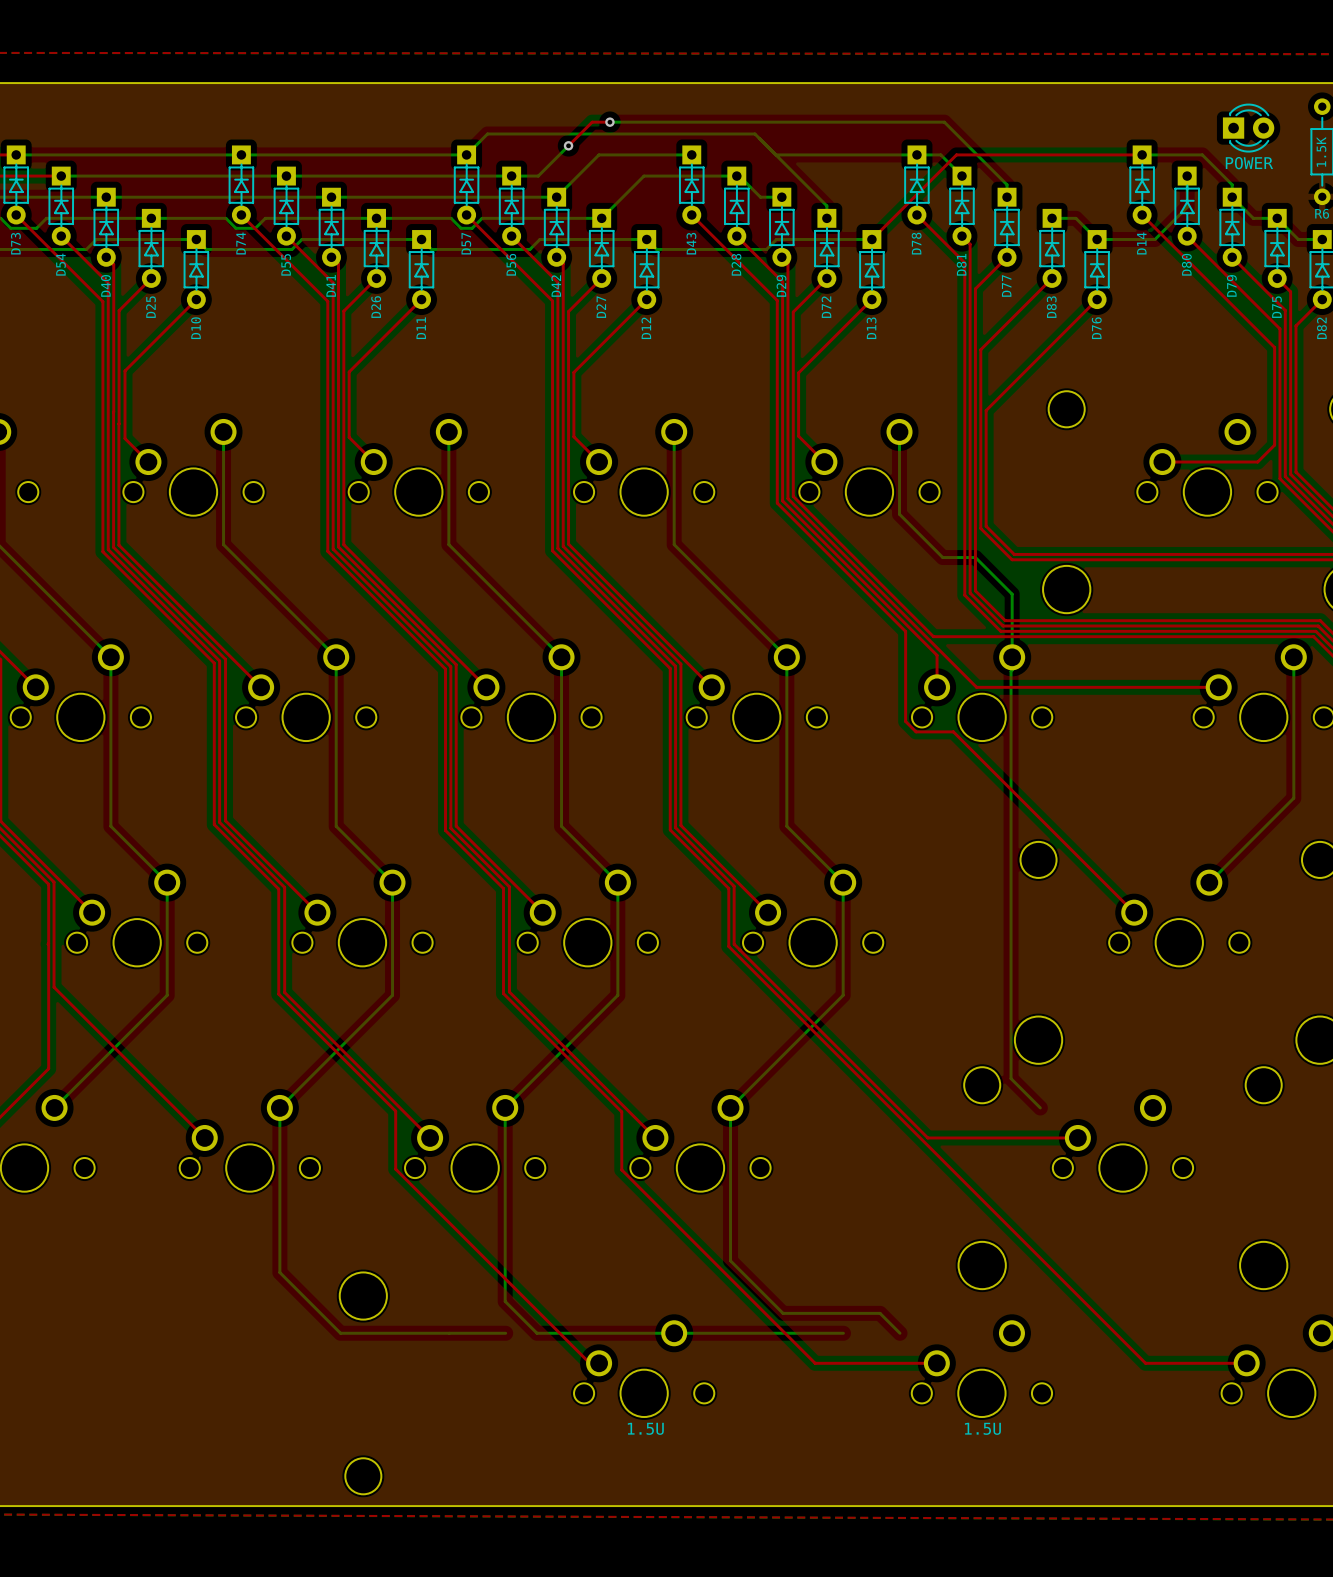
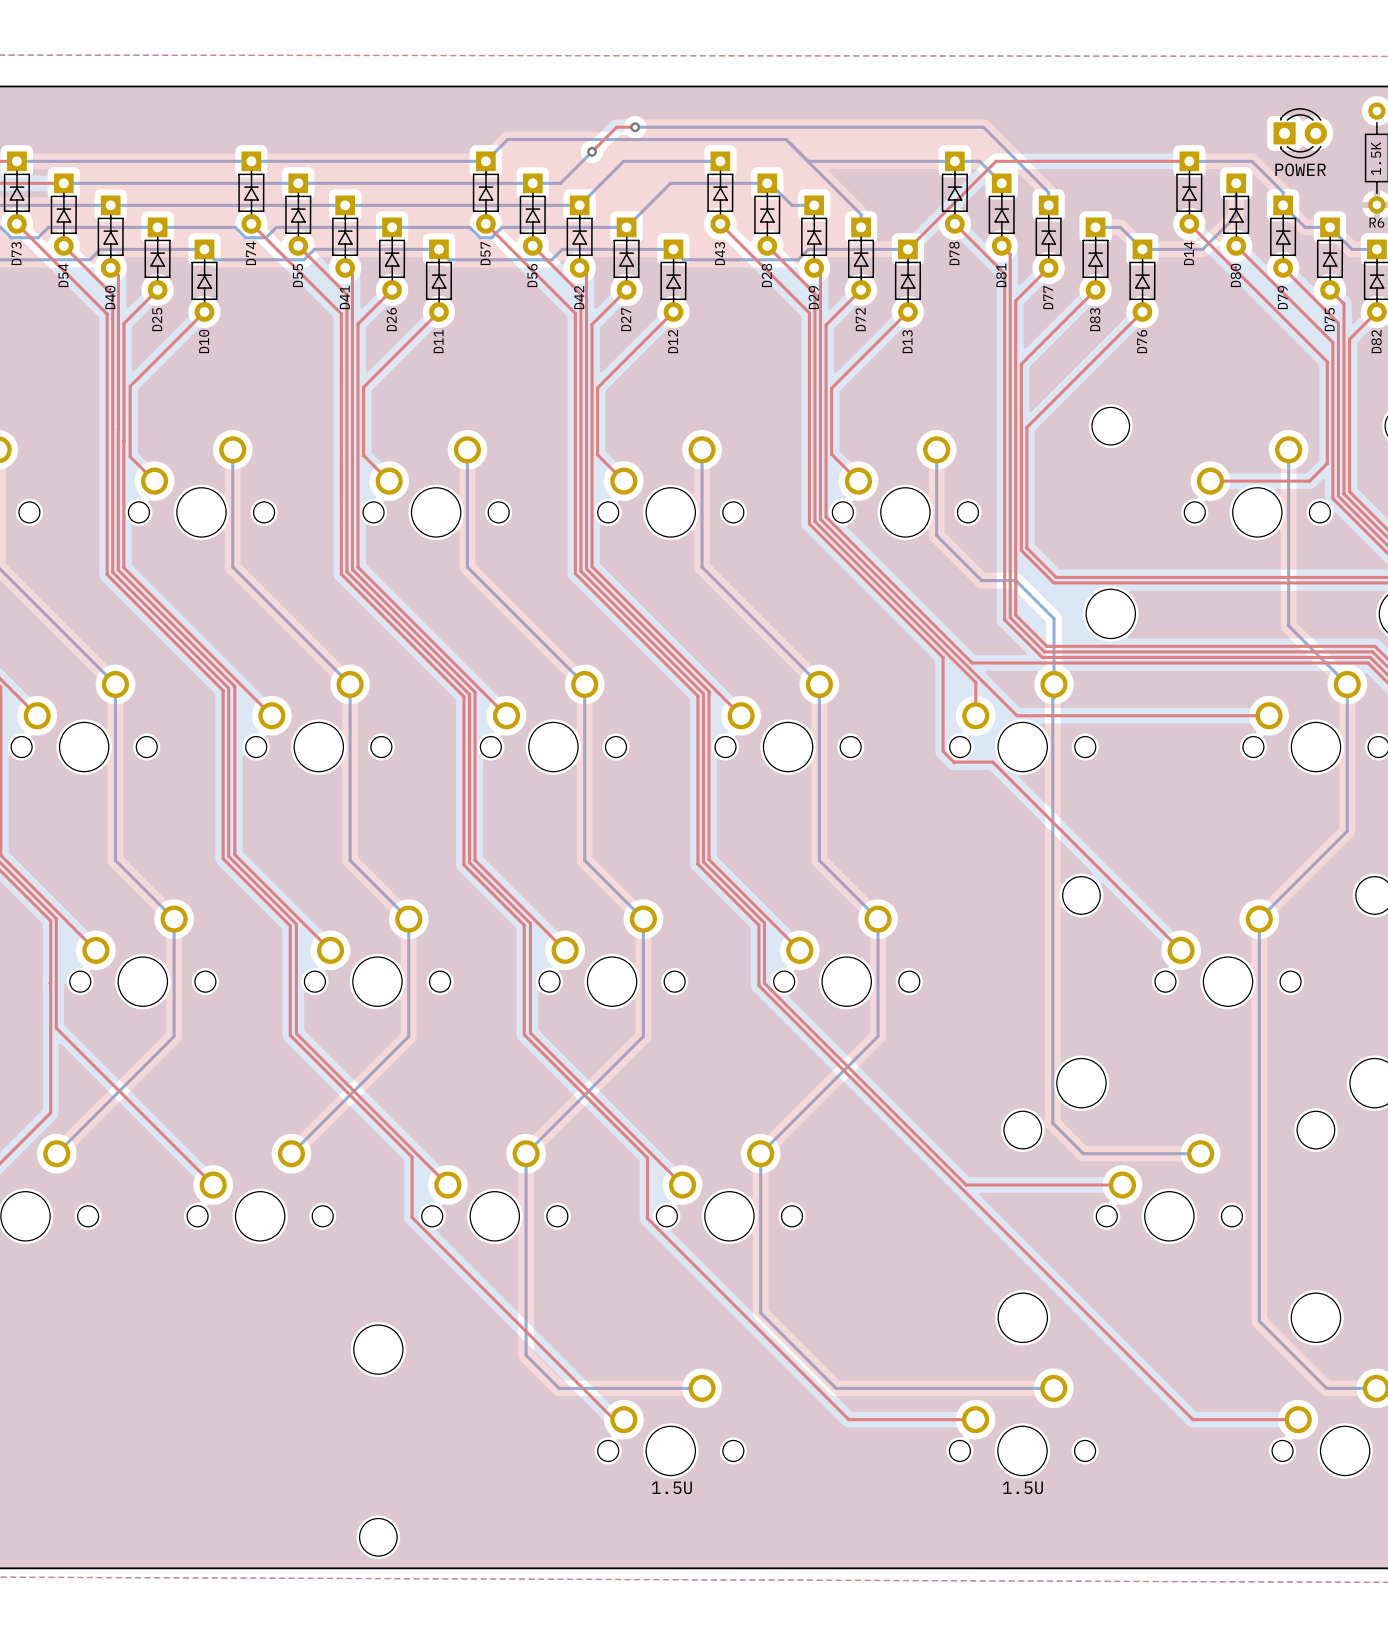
bottom track: none -> (1288, 449) (1288, 625) (1347, 684)
bottom track: none -> (1259, 919) (1259, 1321) (1326, 1388) (1376, 1388)
bottom track: (279, 1107) (279, 1272) (340, 1333) (505, 1333) -> none
bottom track: none -> (1083, 1153) (1200, 1153)
bottom track: (783, 1313) (880, 1313) (899, 1333) -> (815, 1367) (836, 1388)
bottom track: (674, 1333) (802, 1333) -> none
bottom track: none -> (878, 1388) (1053, 1388)

